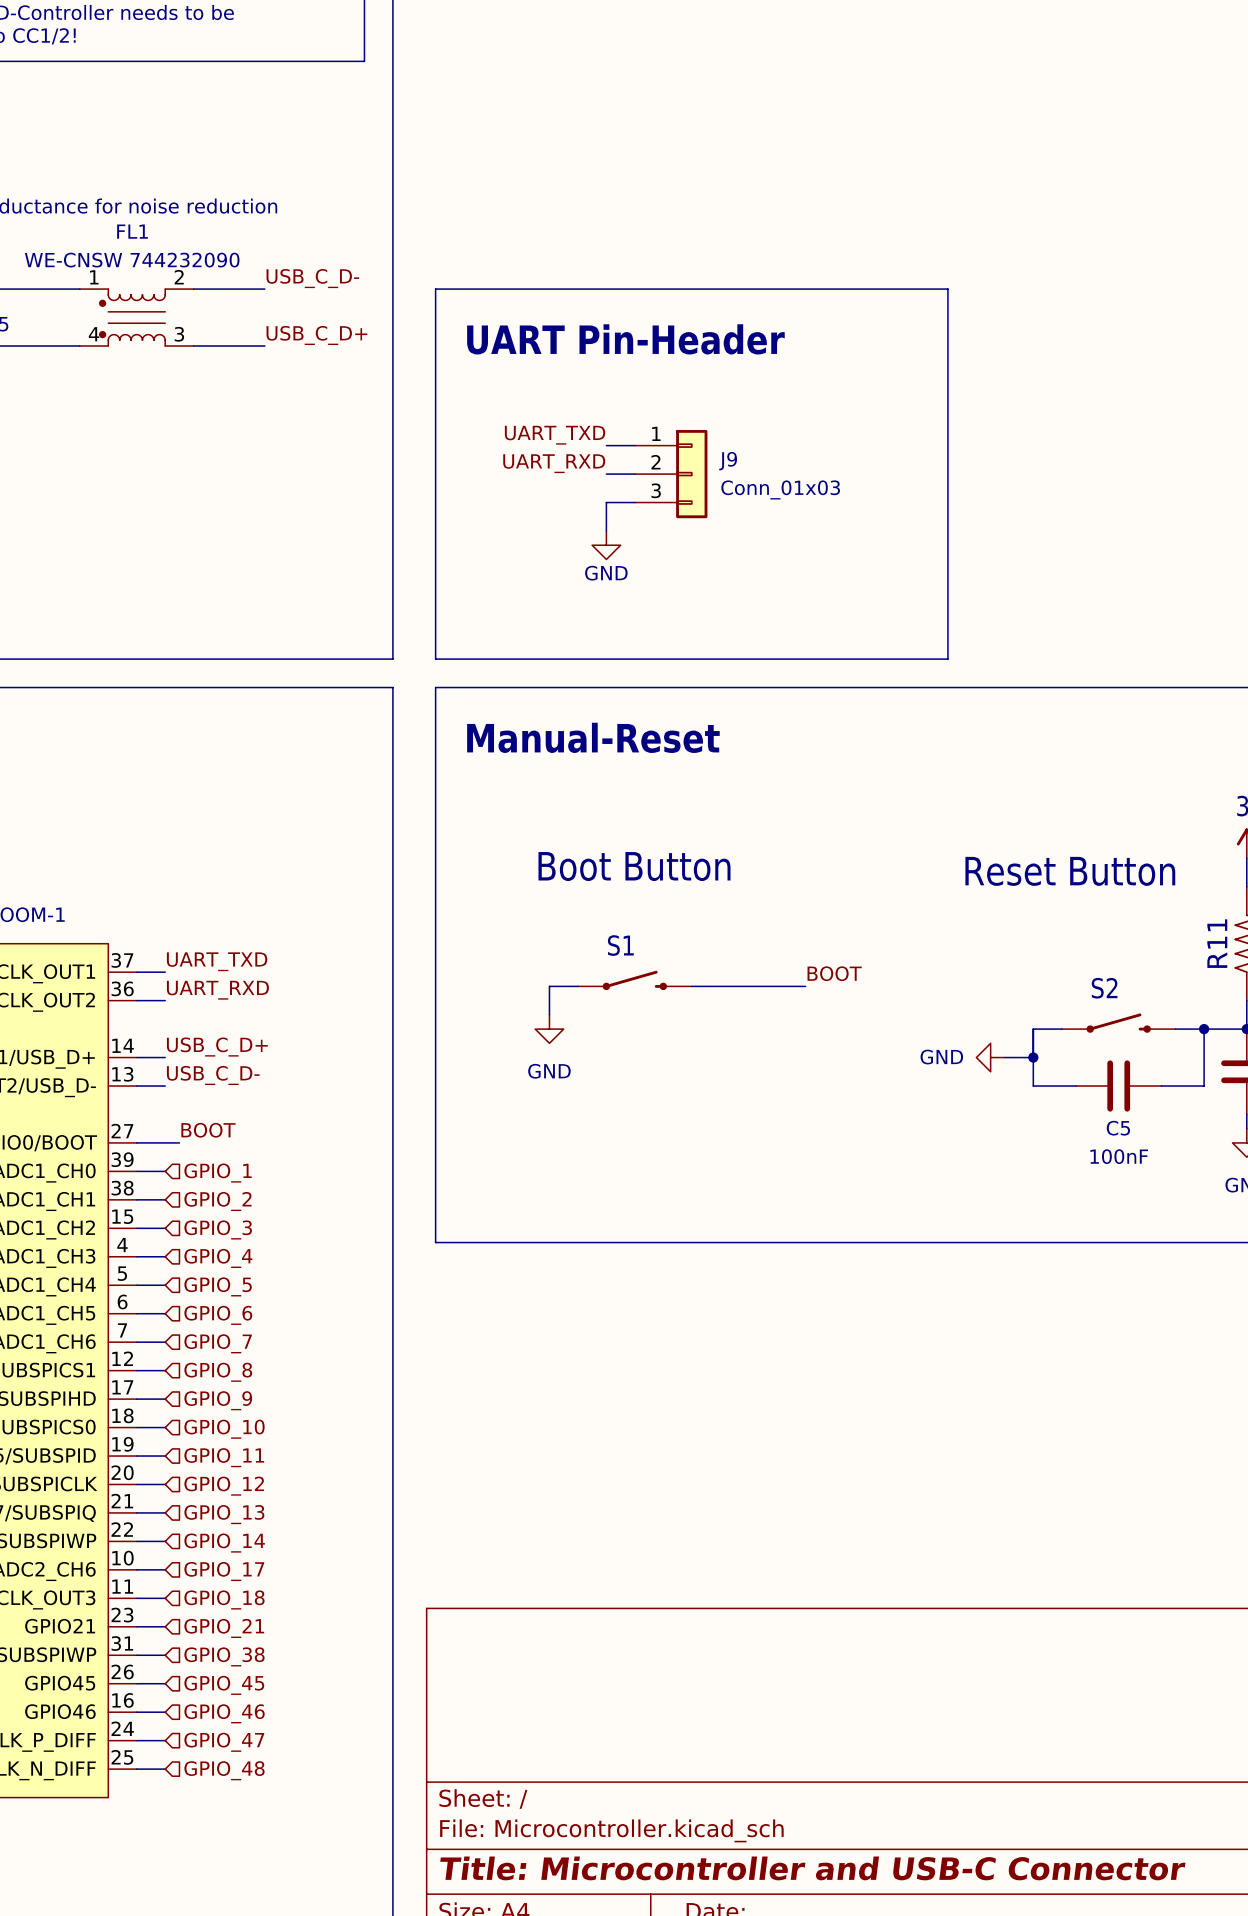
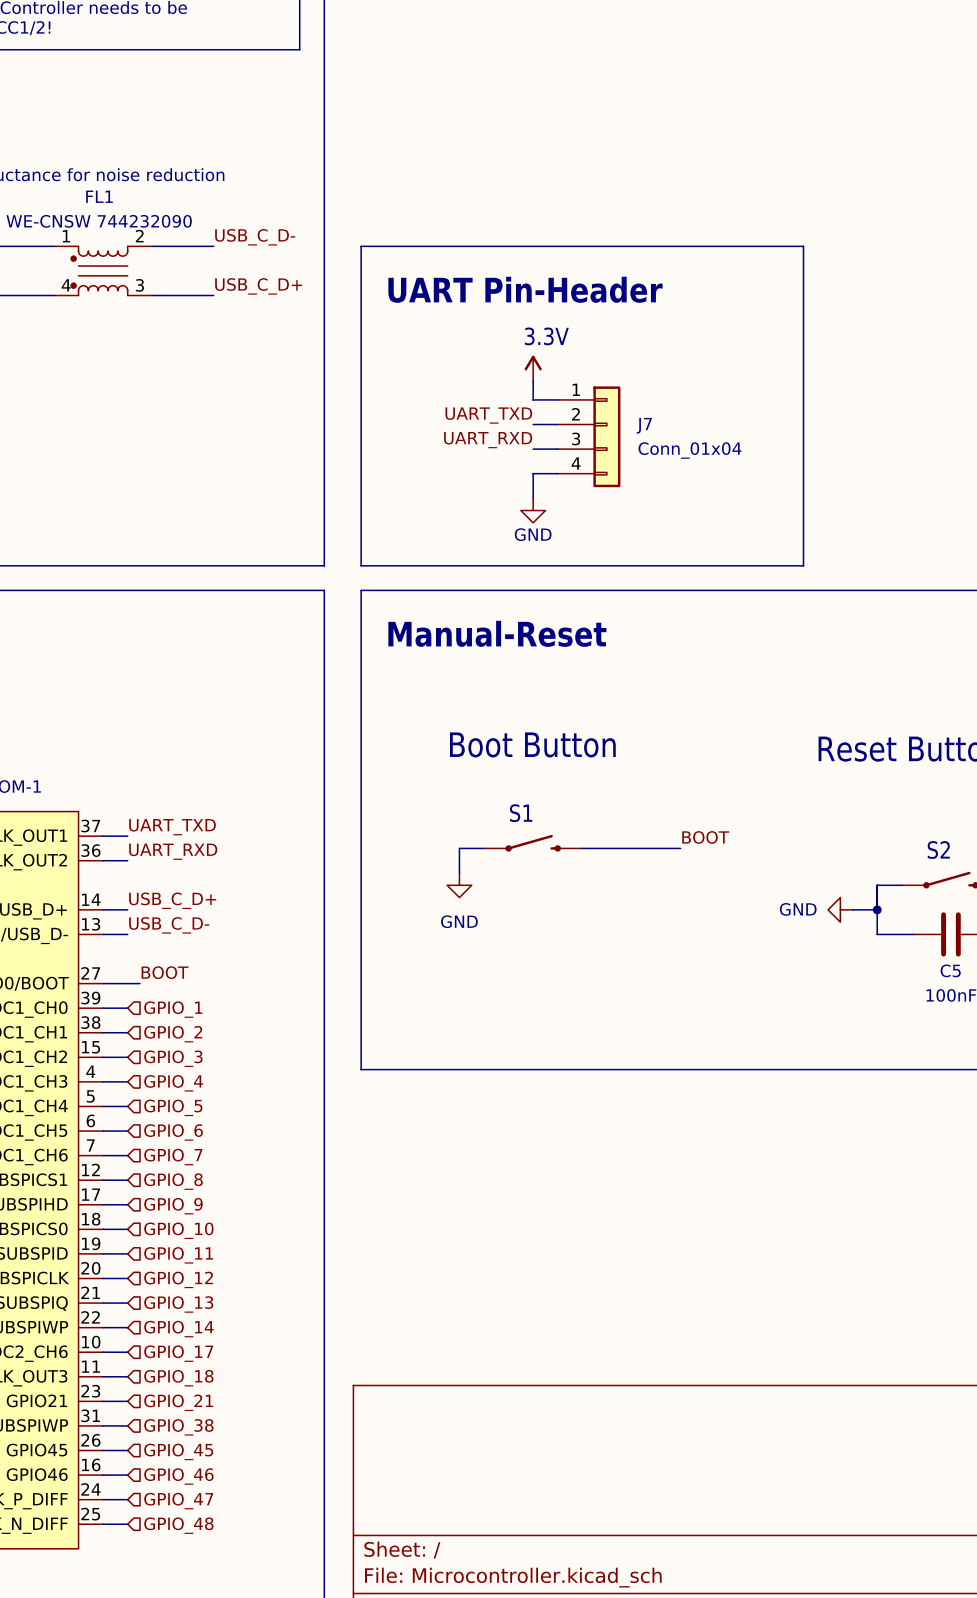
power symbol: none -> 3.3V (533, 368)
label position: UART_TXD (555, 435) -> UART_TXD (488, 415)
wire: (606, 445) (634, 445) -> (557, 399) (533, 399) (533, 381)
label position: UART_RXD (554, 463) -> UART_RXD (488, 440)
wire: (606, 474) (634, 474) -> (533, 424) (557, 424)
J9: Conn_01x03 (671, 474) -> none
wire: (634, 502) (606, 502) (606, 531) -> (557, 473) (533, 473) (533, 498)
J7: none -> Conn_01x04 (589, 436)
wire: none -> (533, 449) (557, 449)
power symbol position: GND (606, 545) -> GND (533, 510)

